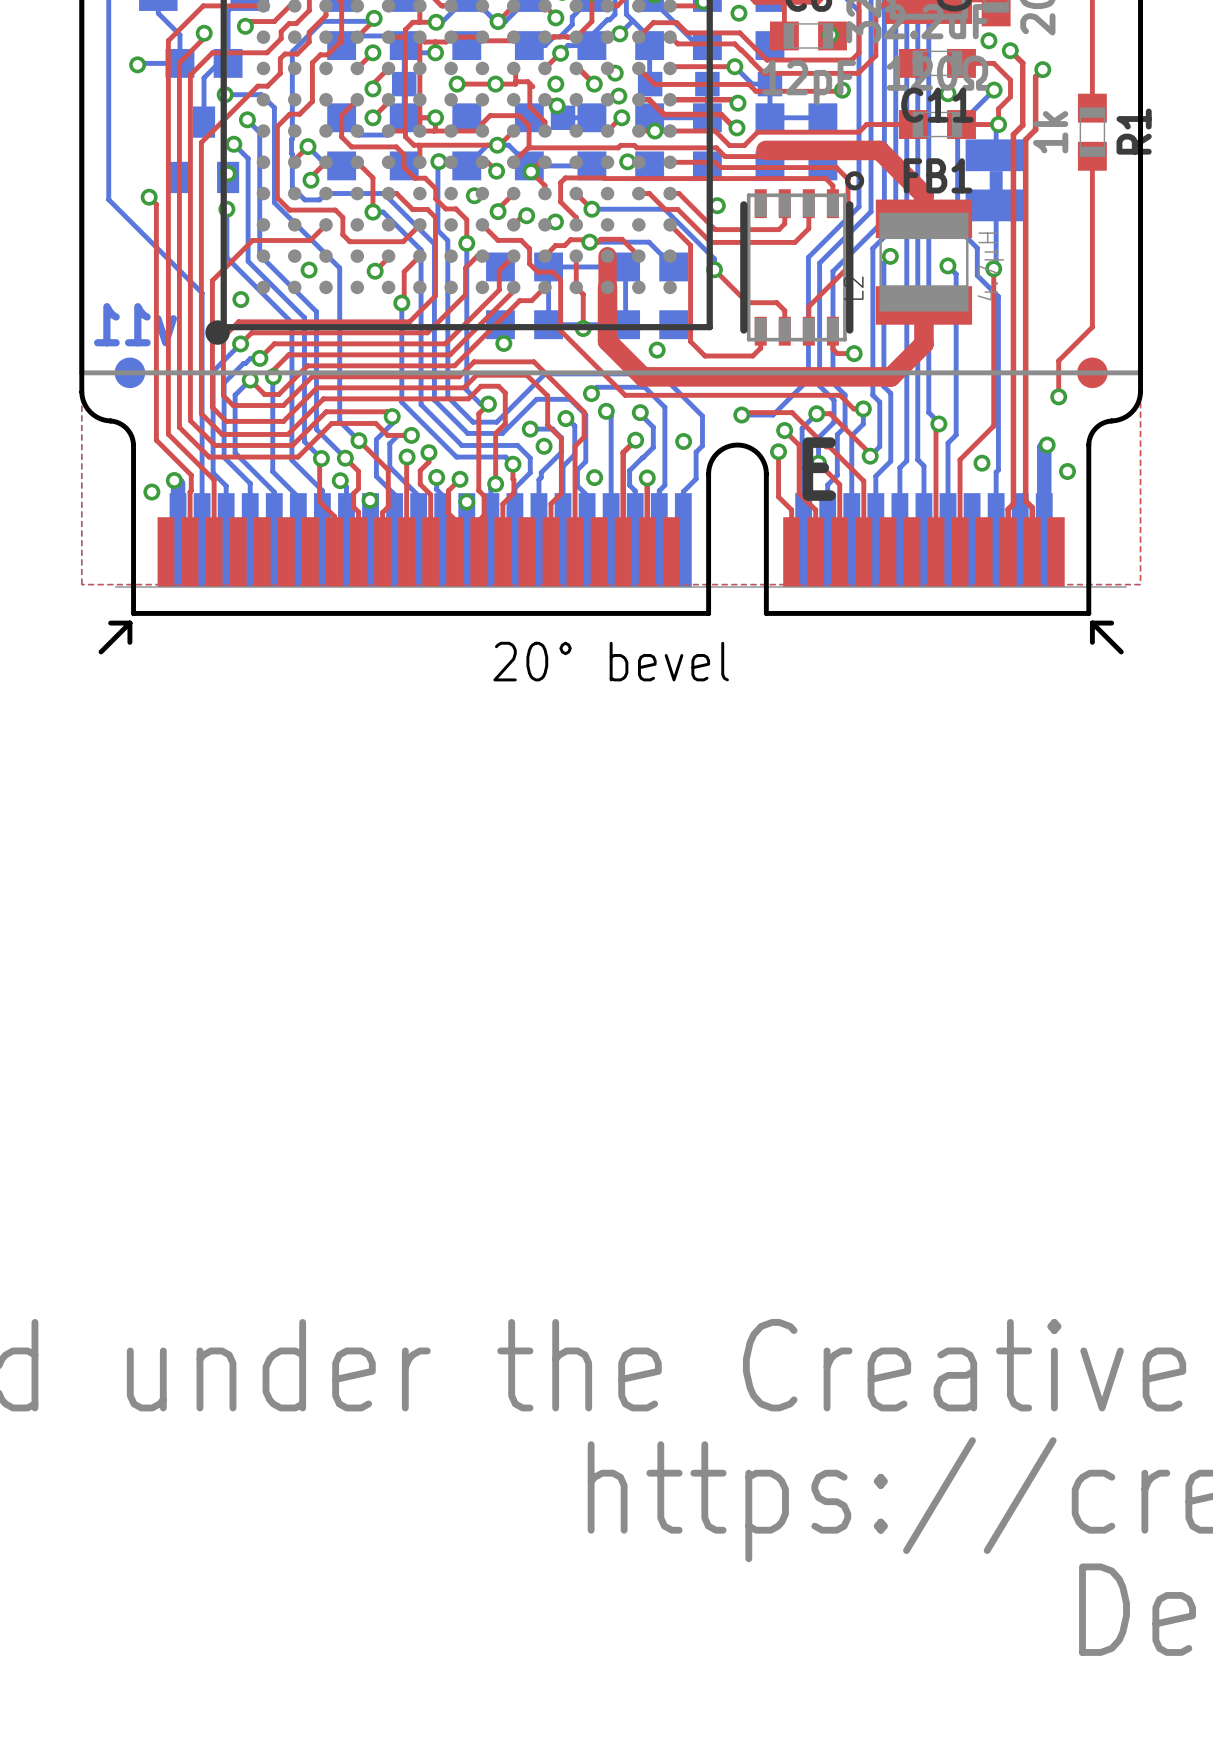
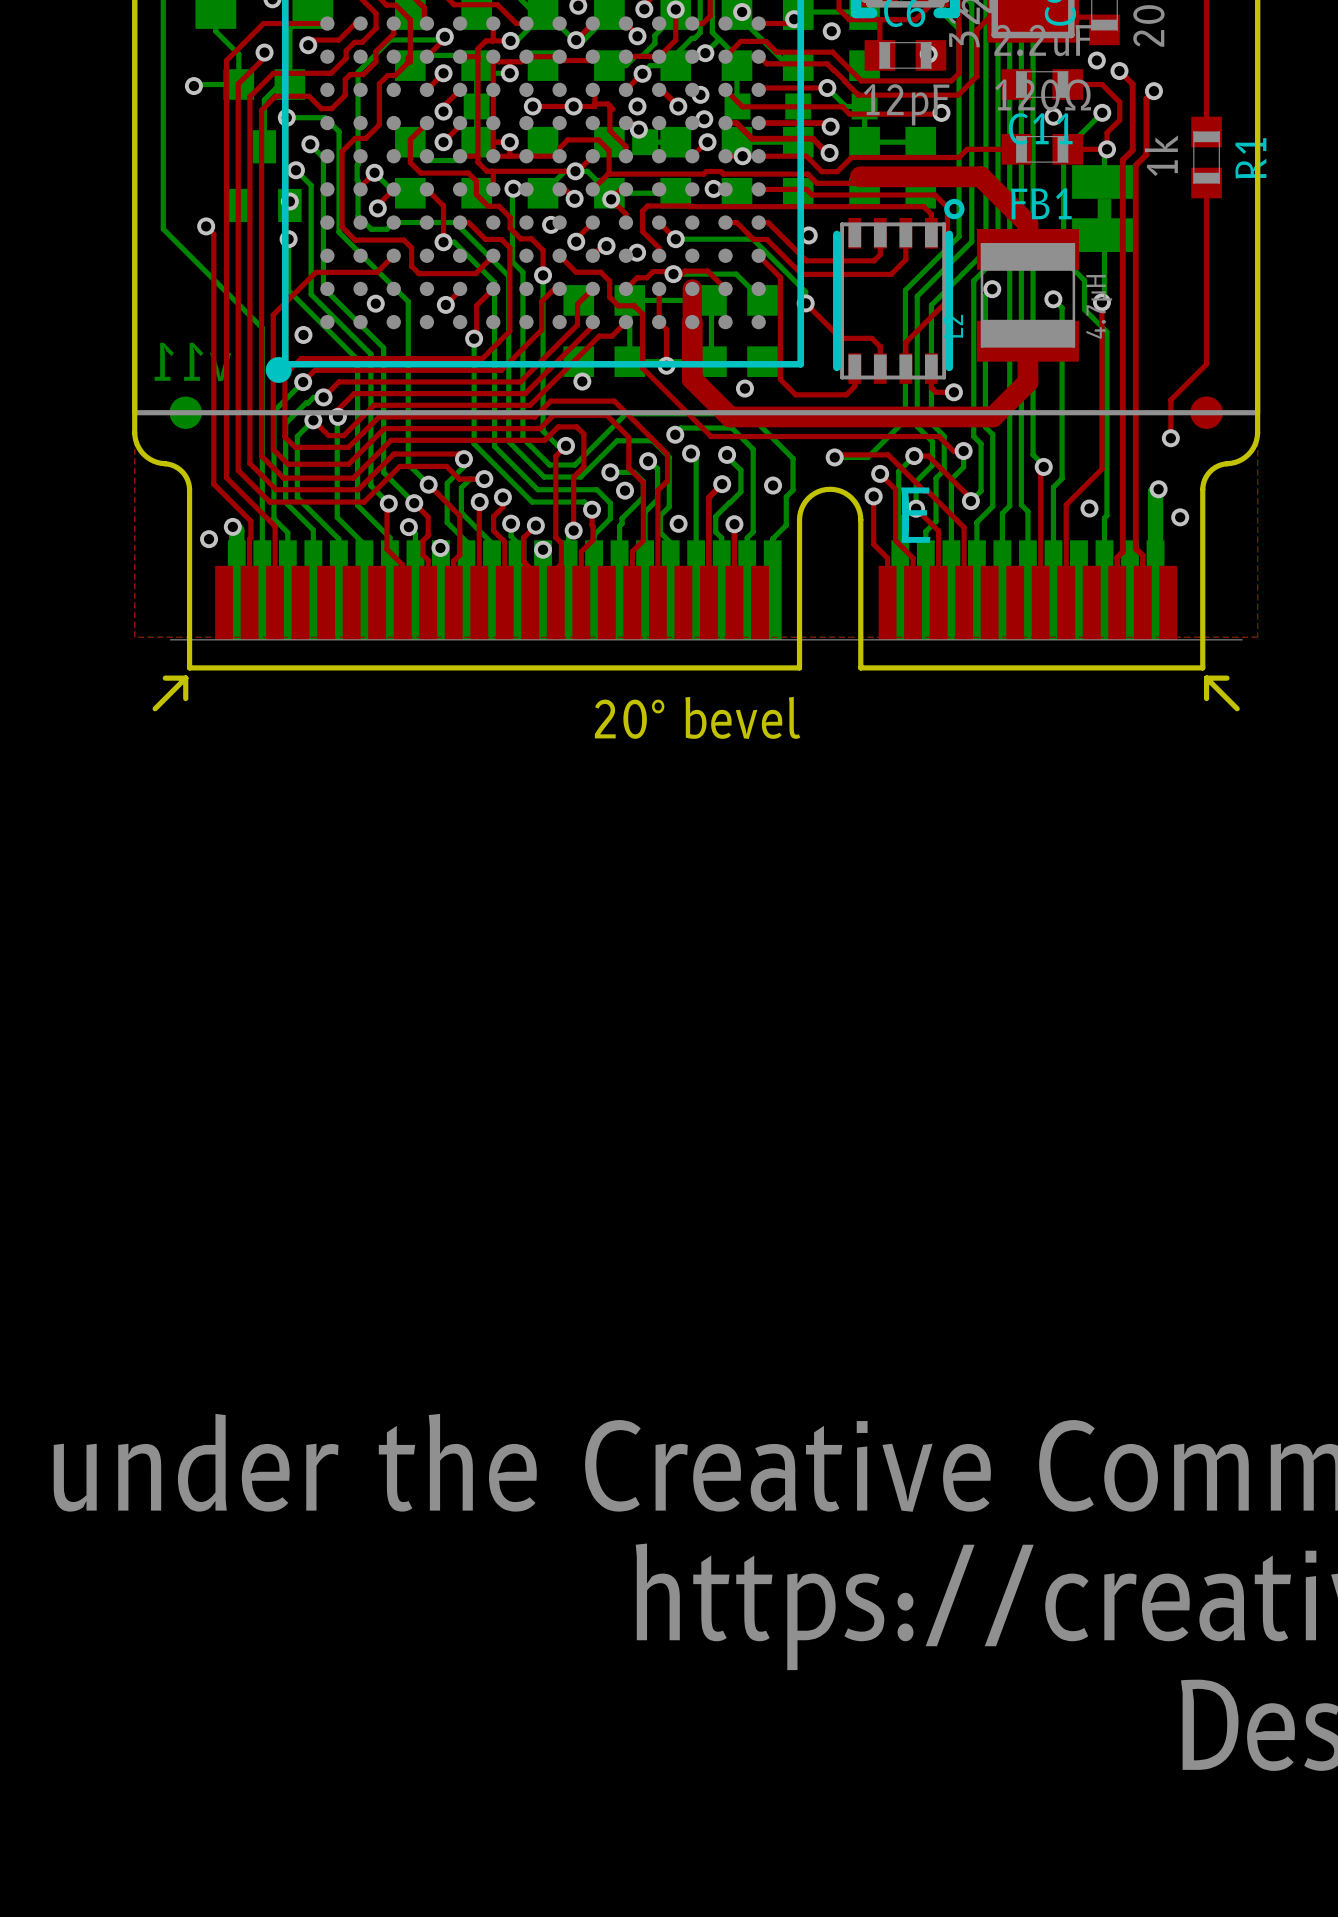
top track: (257, 86) (201, 142) -> (321, 108) (309, 96) (275, 96) (261, 110) (261, 168)

